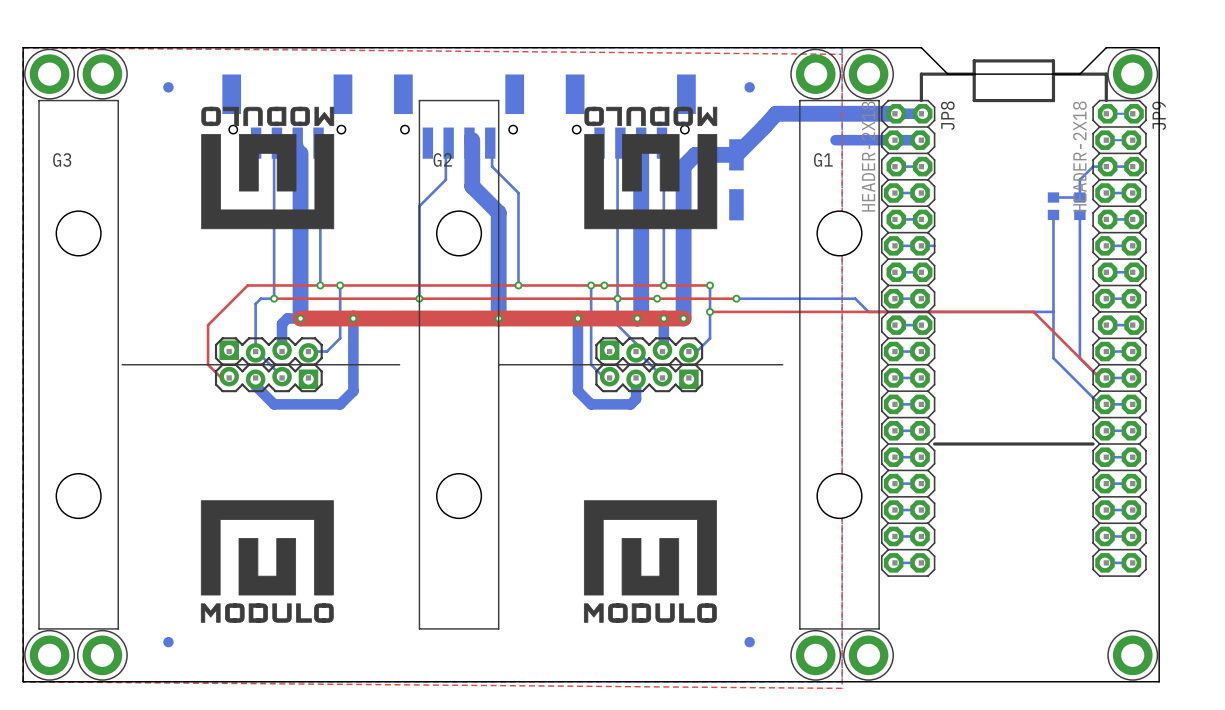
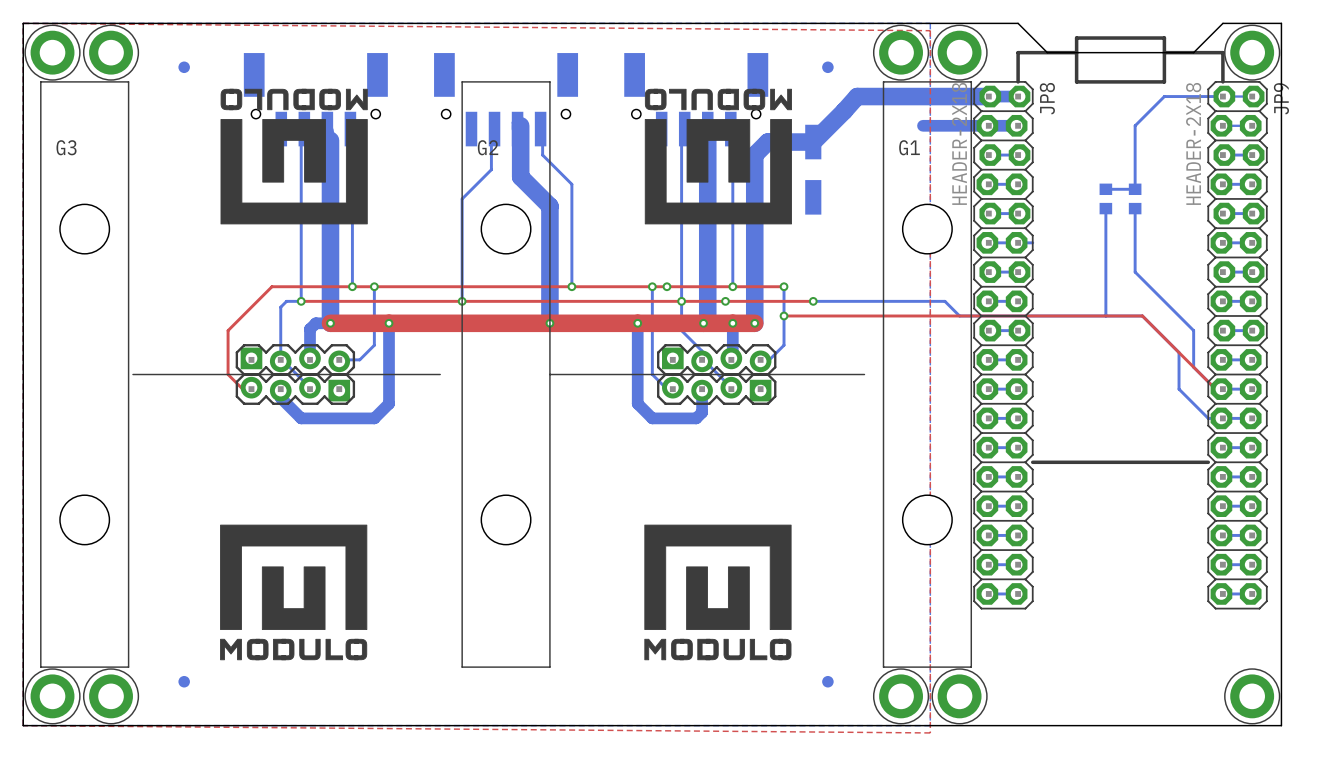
bottom track: none -> (1224, 96) (1164, 96) (1135, 125) (1135, 189) (1105, 189)
bottom track: (1107, 166) (1093, 166) (1079, 179) (1079, 197) (1053, 197) -> none
part: none -> (1105, 198)
part: none -> (1135, 198)
part: (1053, 206) -> none
part: (1079, 206) -> none
bottom track: none -> (1105, 208) (1105, 315)
bottom track: (1053, 214) (1053, 358) (1099, 404) -> (1142, 315) (1179, 352) (1179, 389) (1208, 418) (1215, 418)
bottom track: (1079, 214) (1079, 325) -> (1135, 208) (1135, 272) (1193, 330)
bottom track: (1033, 311) (1053, 311) -> none

